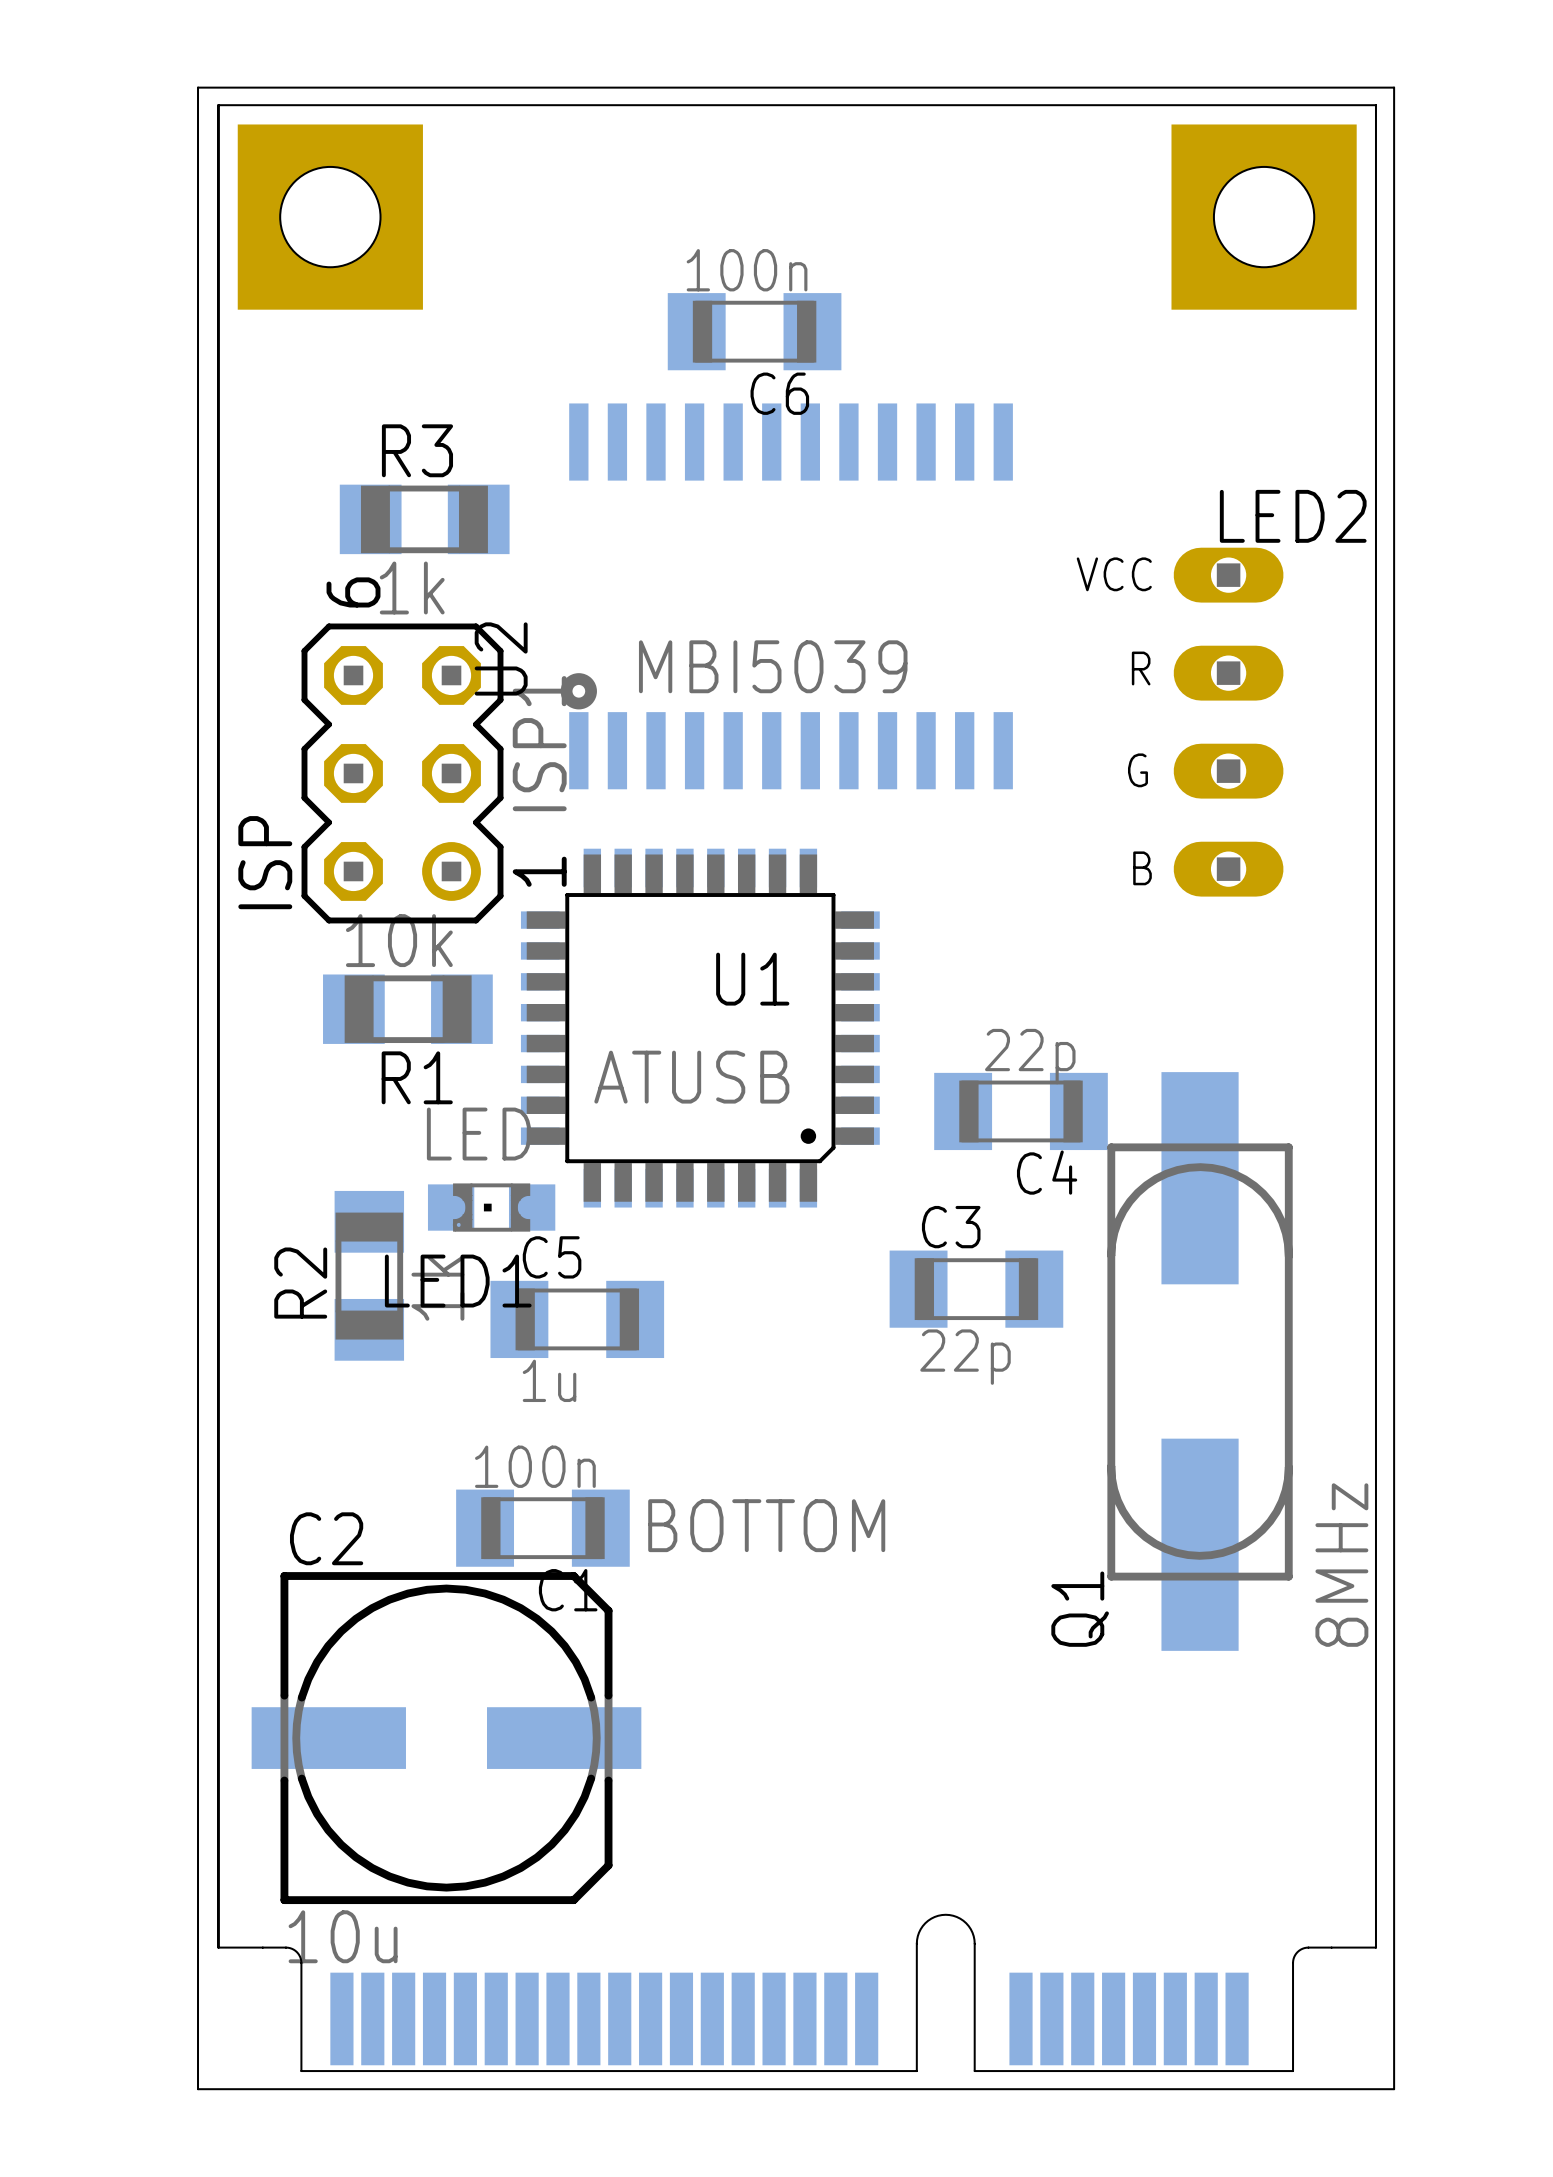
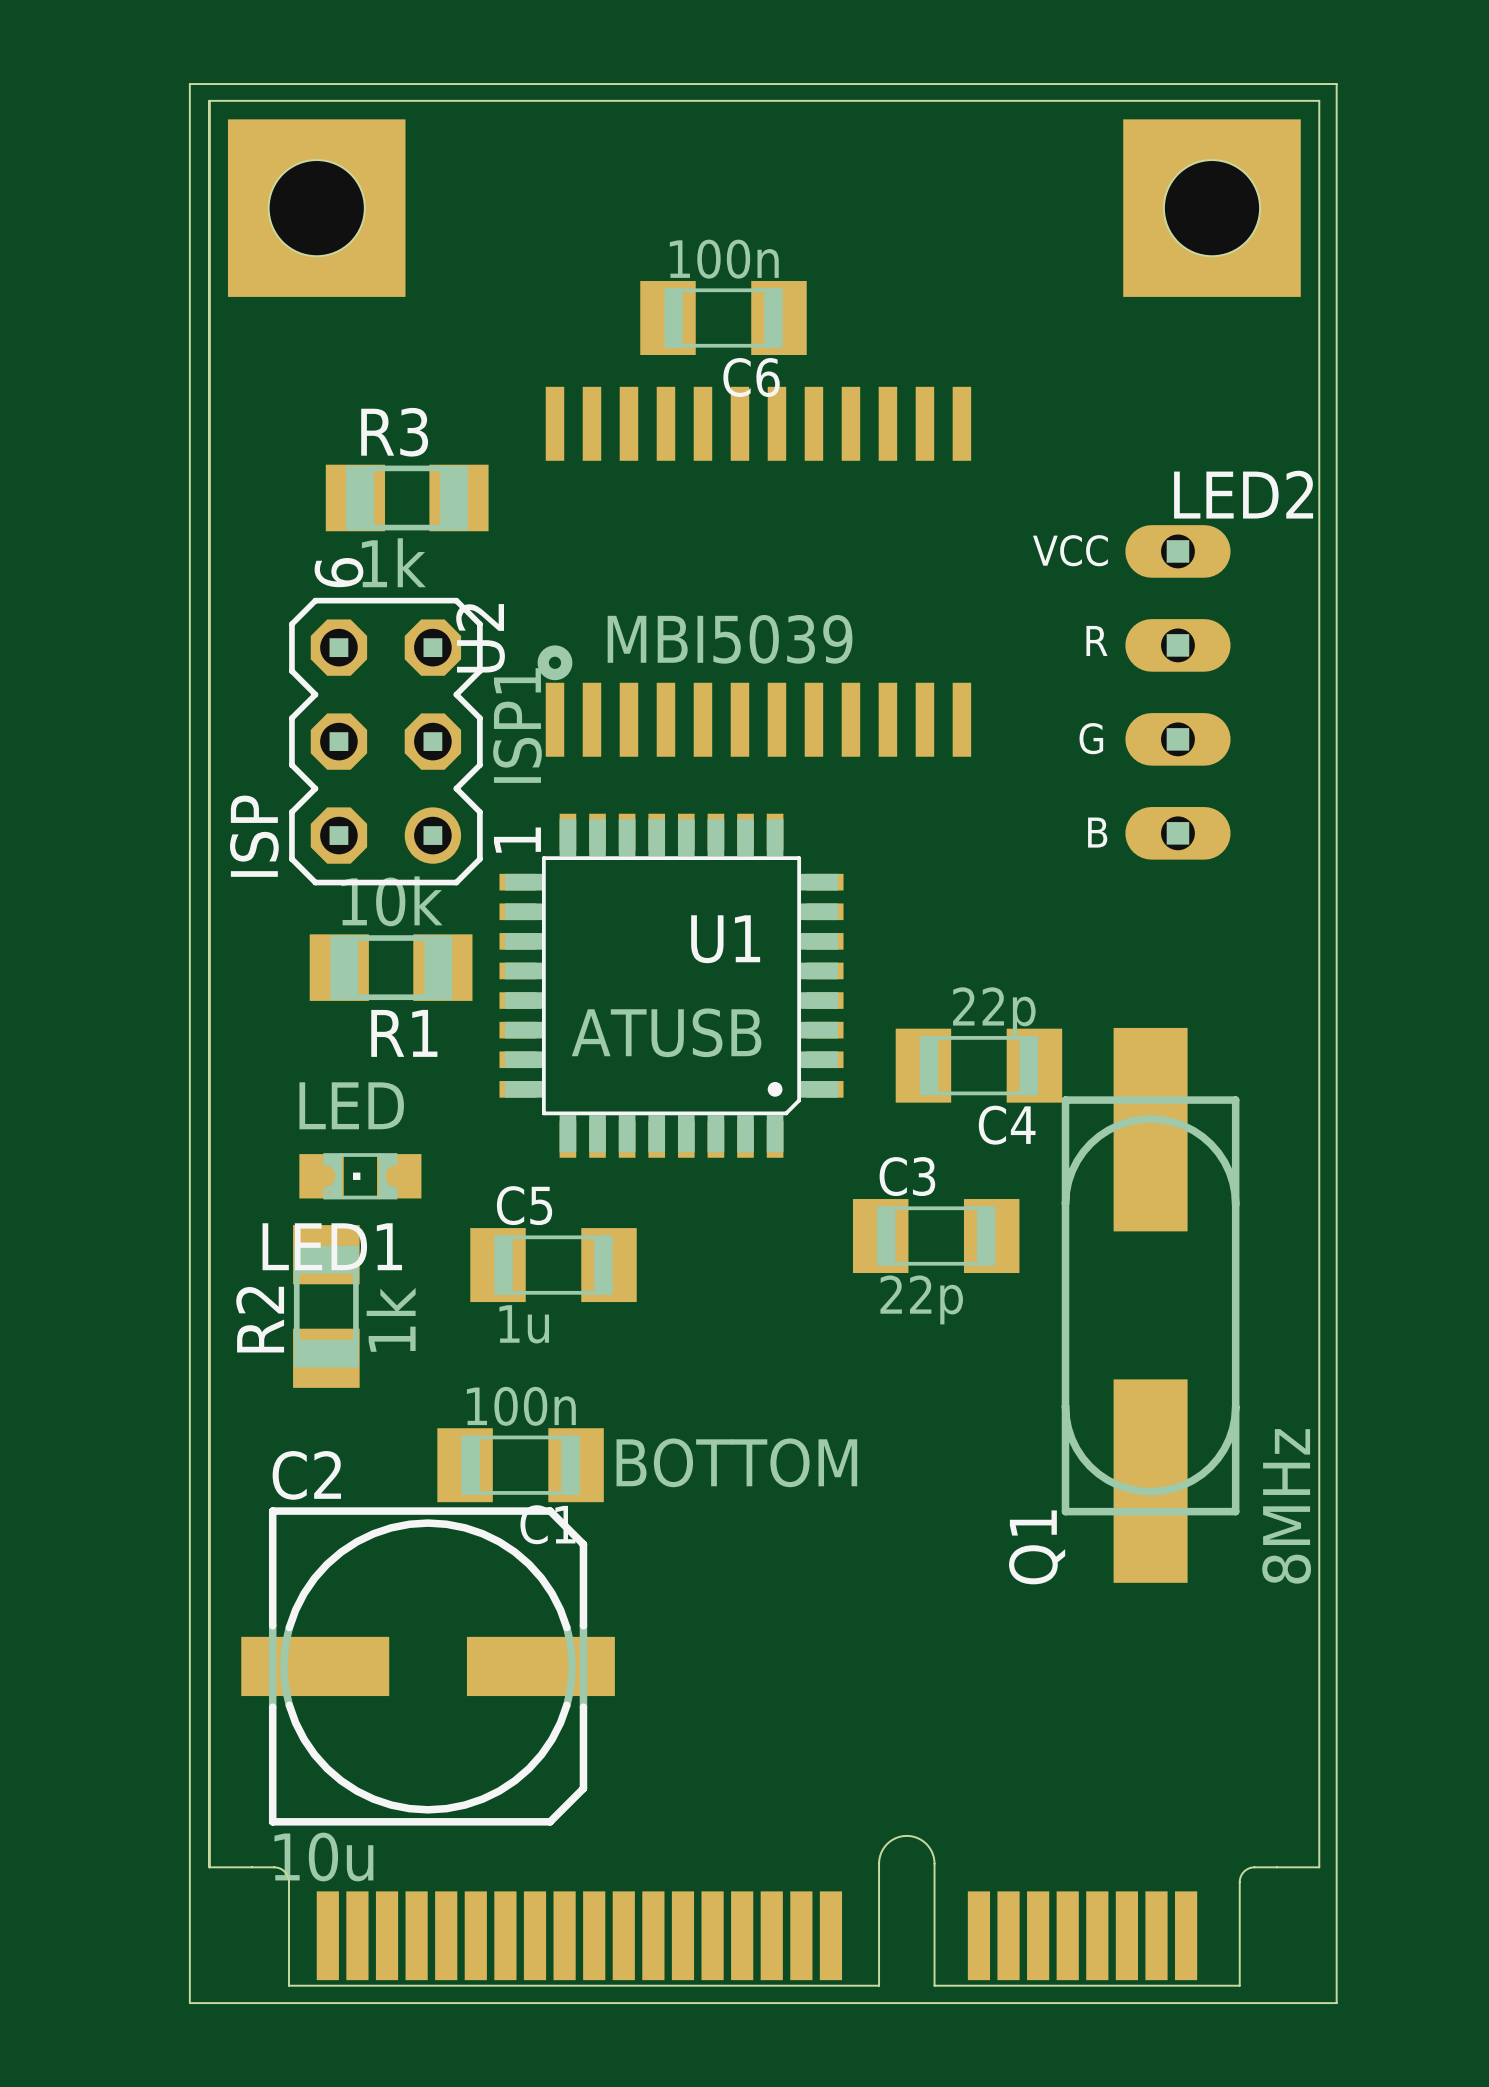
LED1 position: (491, 1207) -> (360, 1176)
R2 position: (369, 1275) -> (326, 1306)

